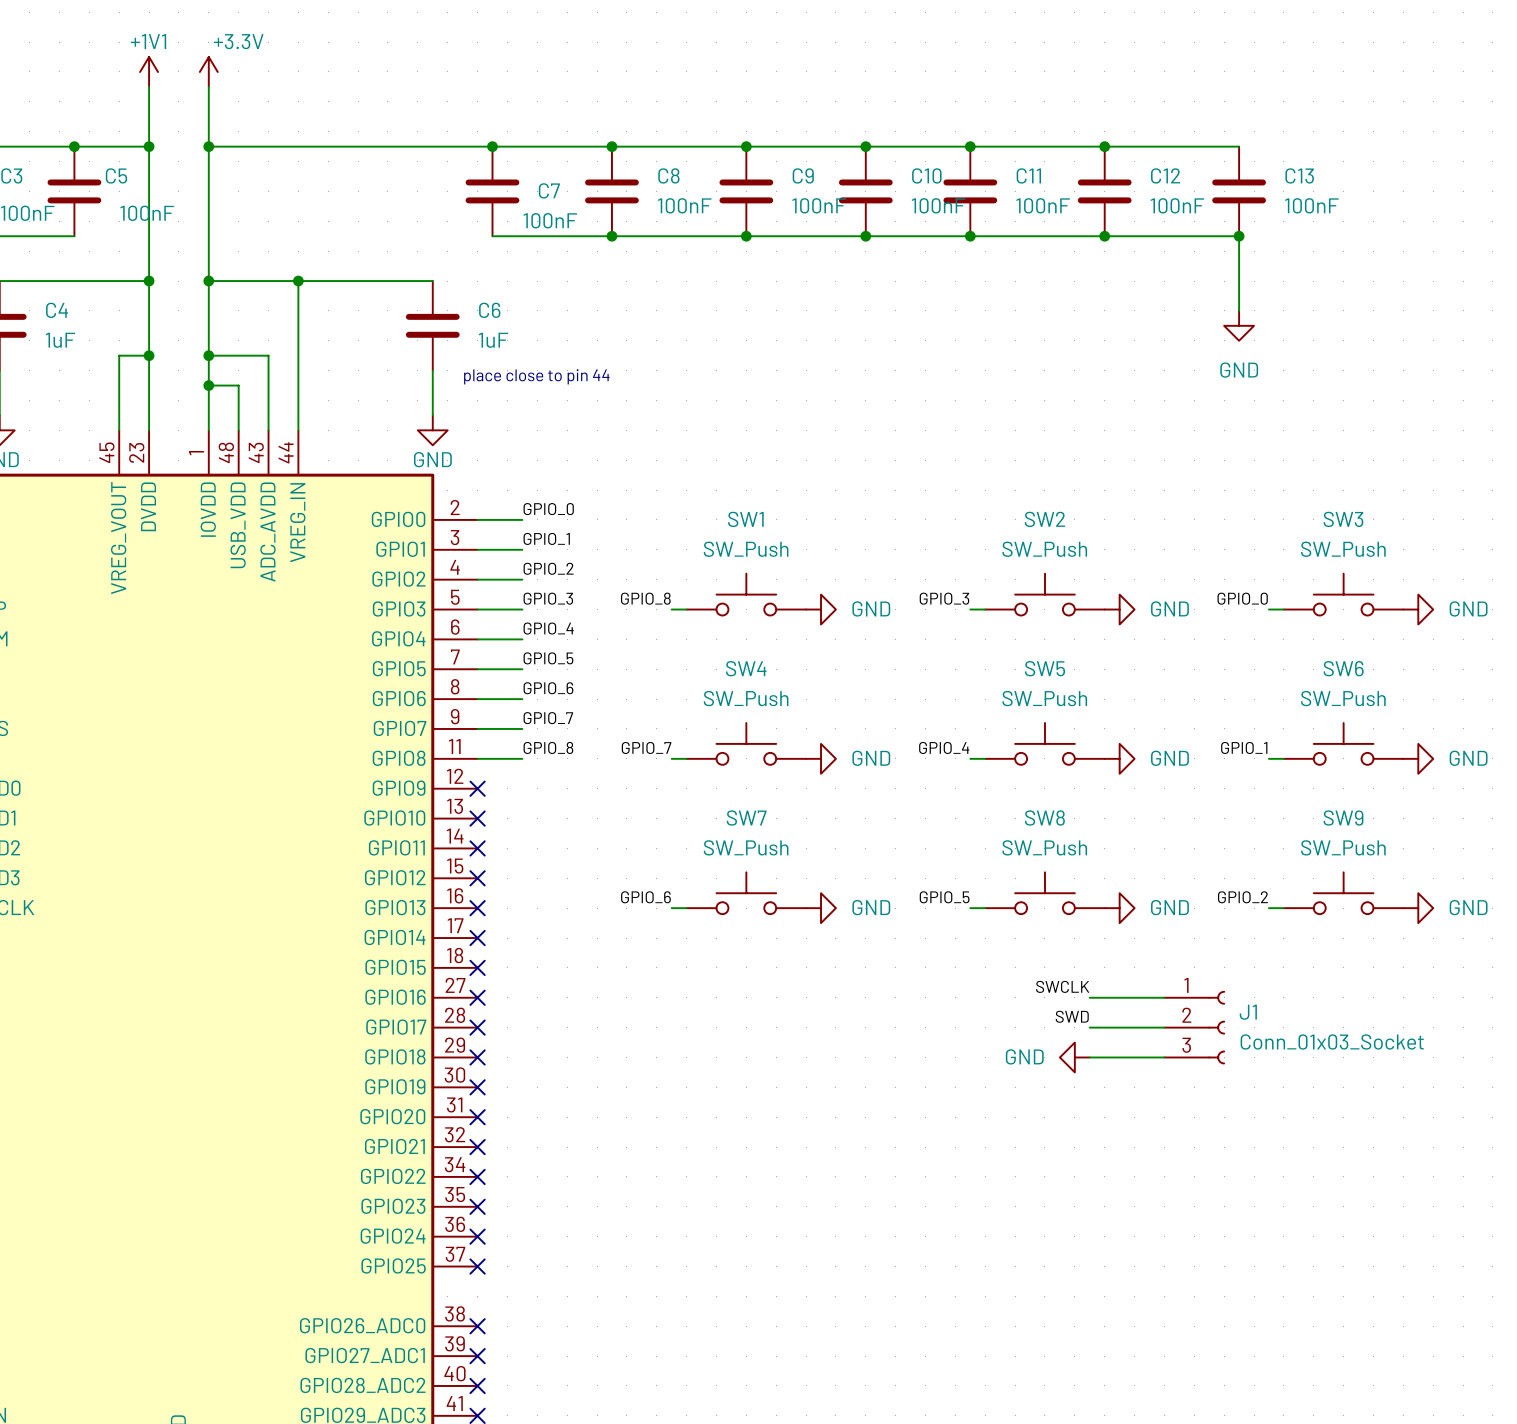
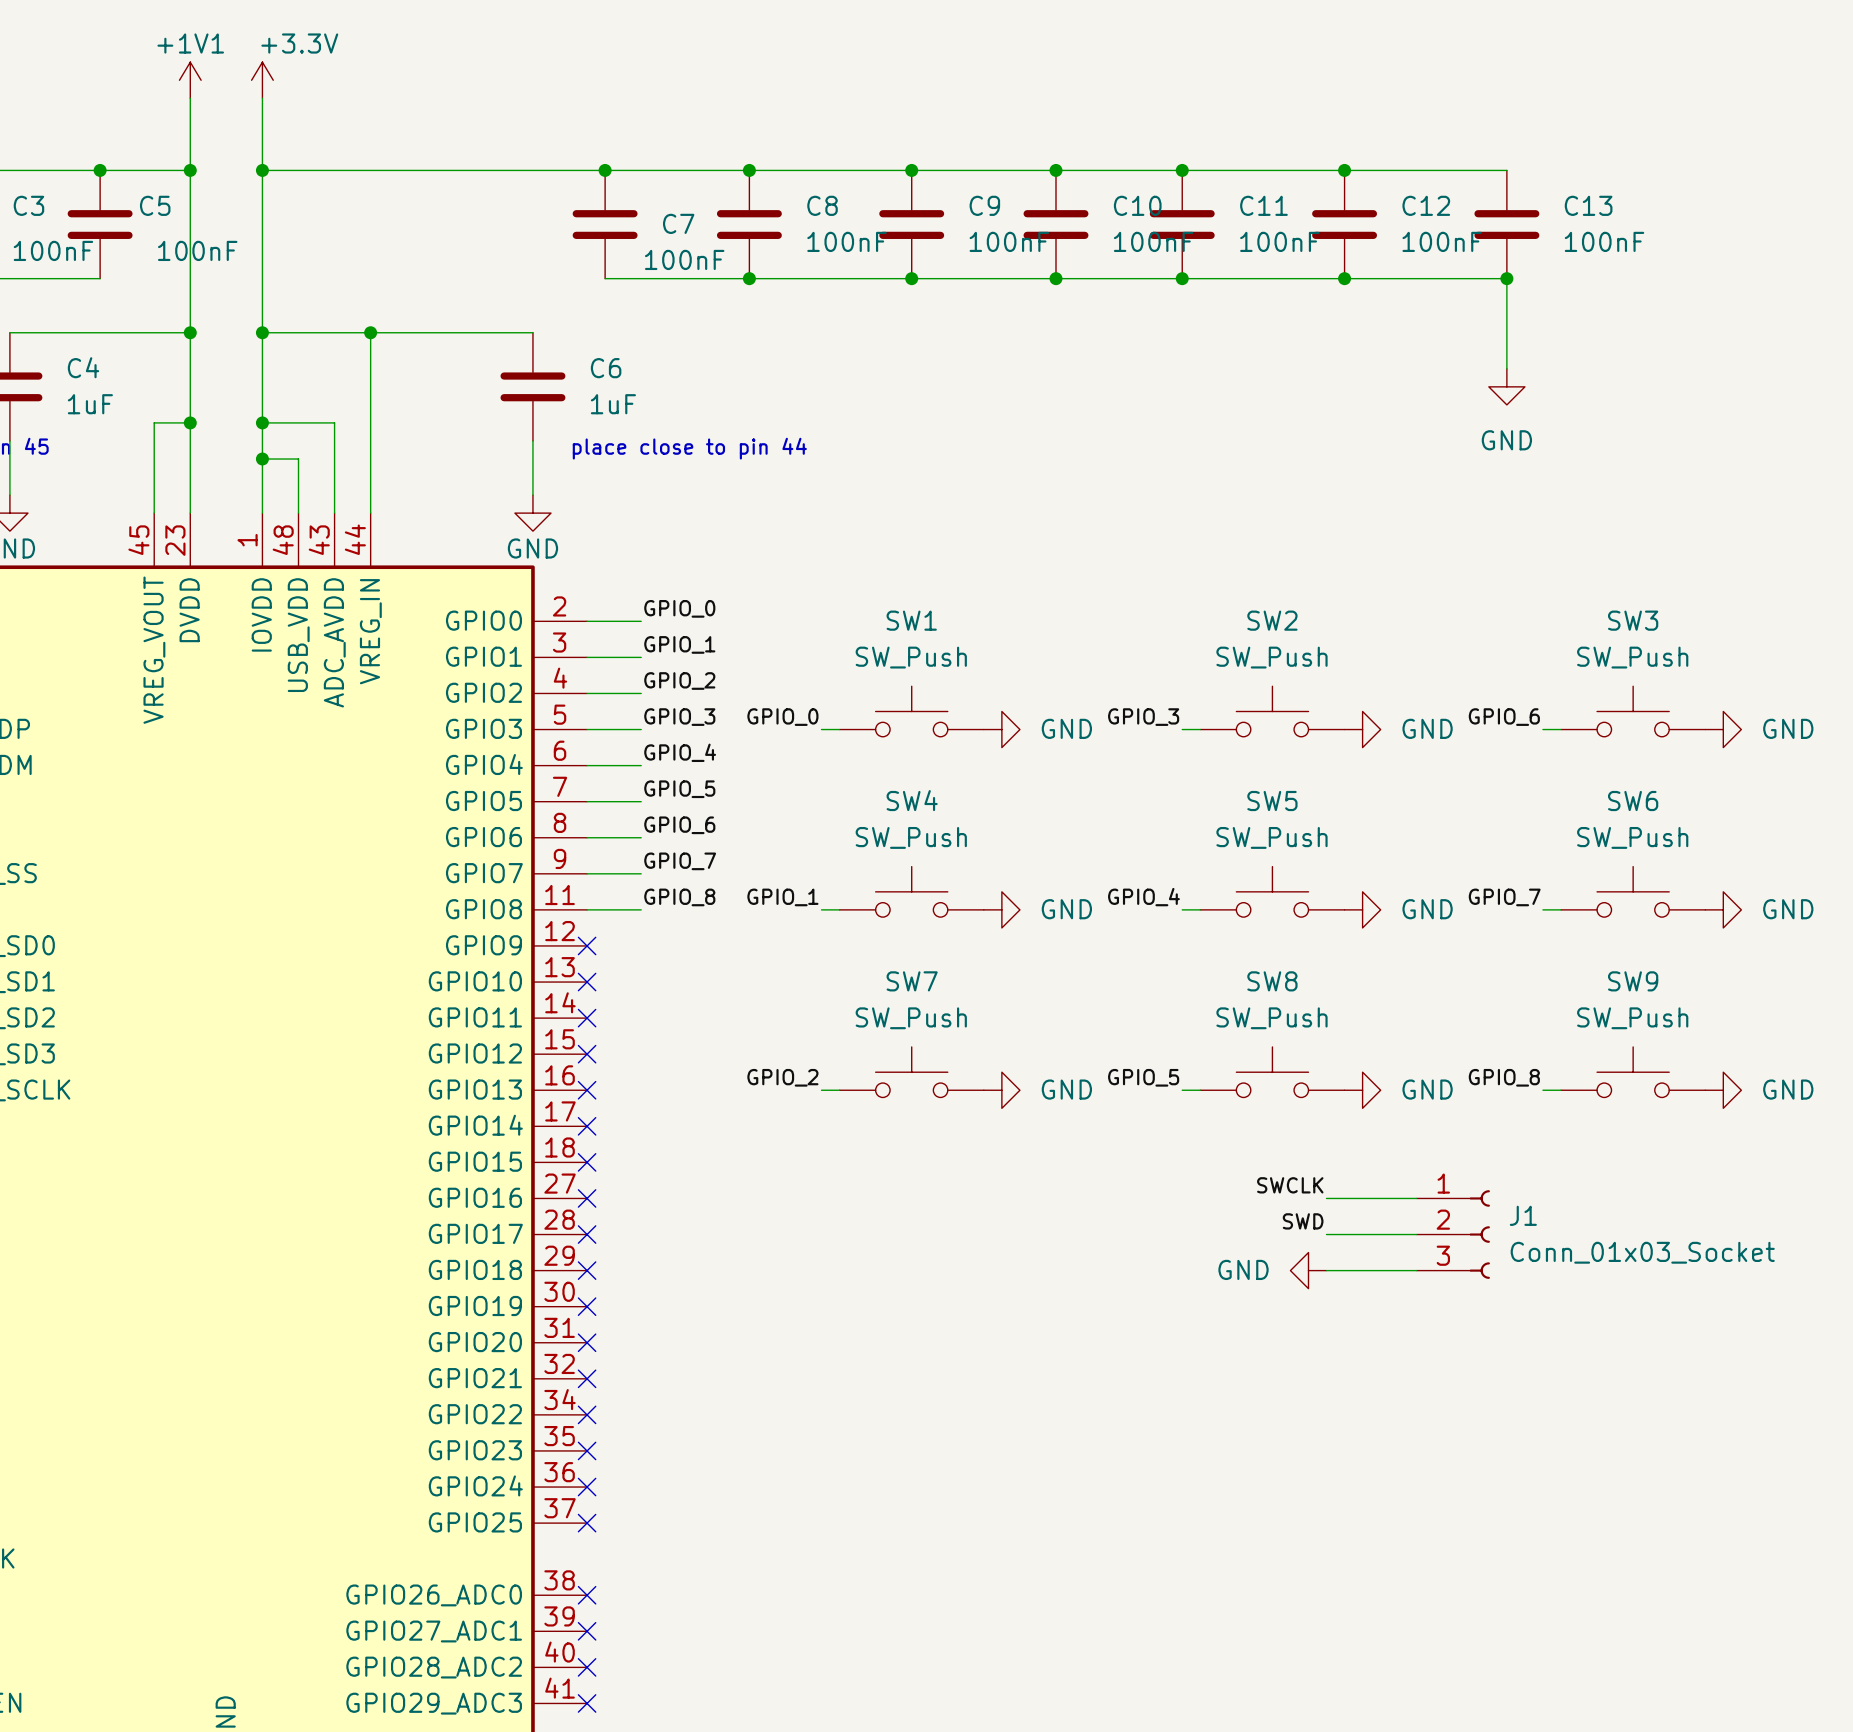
label: GPIO_8 (645, 598) -> GPIO_0 (782, 717)
label: GPIO_0 (1242, 598) -> GPIO_6 (1504, 717)
label: GPIO_7 (646, 747) -> GPIO_1 (782, 897)
label: GPIO_1 (1244, 747) -> GPIO_7 (1504, 897)
label: GPIO_6 (645, 897) -> GPIO_2 (782, 1077)
label: GPIO_2 (1242, 897) -> GPIO_8 (1504, 1077)

